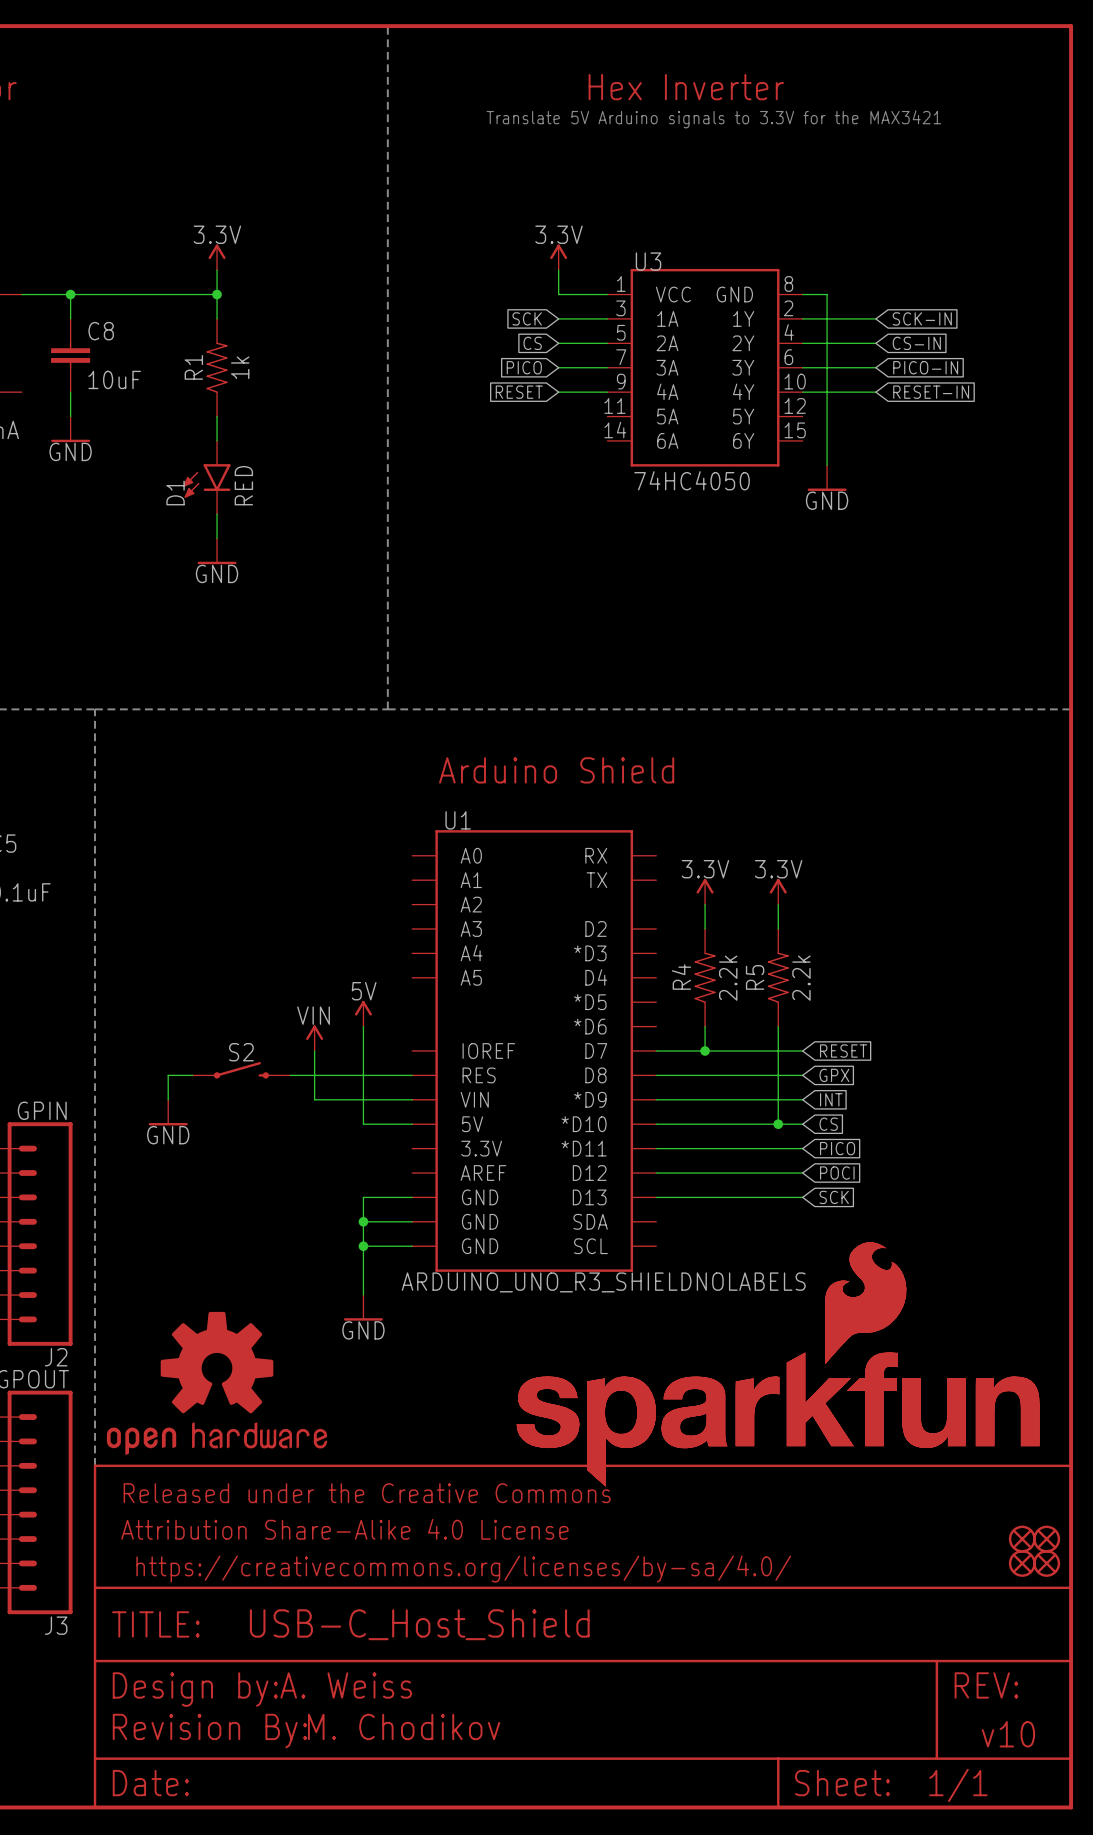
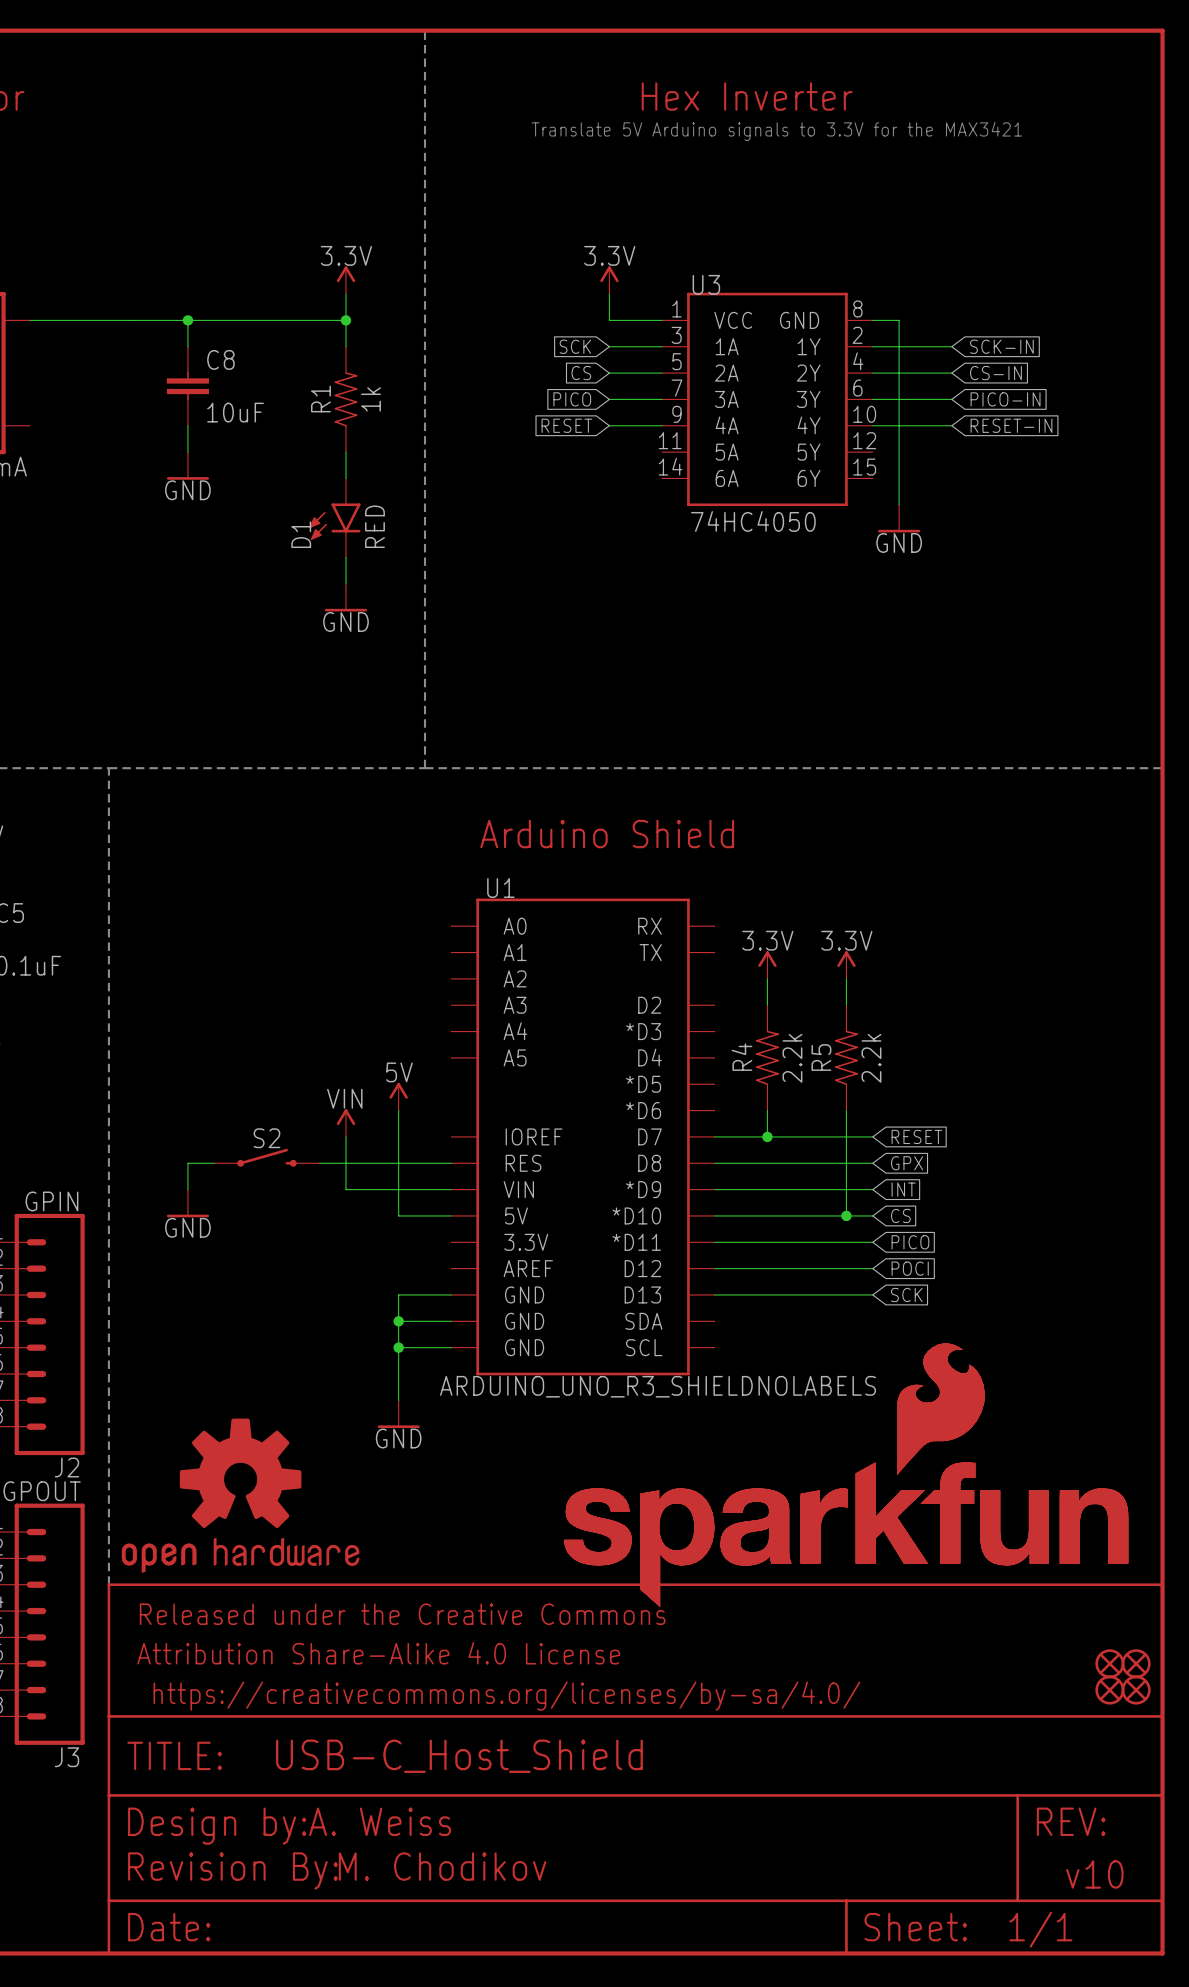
power symbol position: 3.3V (217, 257) -> 3.3V (345, 280)
wire: (217, 270) (217, 318) -> (345, 294) (345, 346)
wire: (70, 294) (70, 318) -> (187, 320) (187, 346)
junction: (70, 294) -> none
junction: none -> (187, 320)
wire: none -> (240, 320) (345, 320)
junction: (217, 294) -> none
junction: none -> (345, 320)
C8 position: (70, 355) -> (187, 386)
R1 position: (217, 367) -> (345, 399)
wire: (70, 392) (70, 416) -> (187, 425) (187, 452)
wire: (217, 416) (217, 440) -> (345, 452) (345, 478)
power symbol: GND (70, 429) -> none
power symbol: none -> GND (187, 465)
D1 position: (206, 477) -> (335, 517)
wire: (217, 514) (217, 538) -> (345, 557) (345, 583)
power symbol: GND (217, 551) -> none
power symbol: none -> GND (345, 597)

